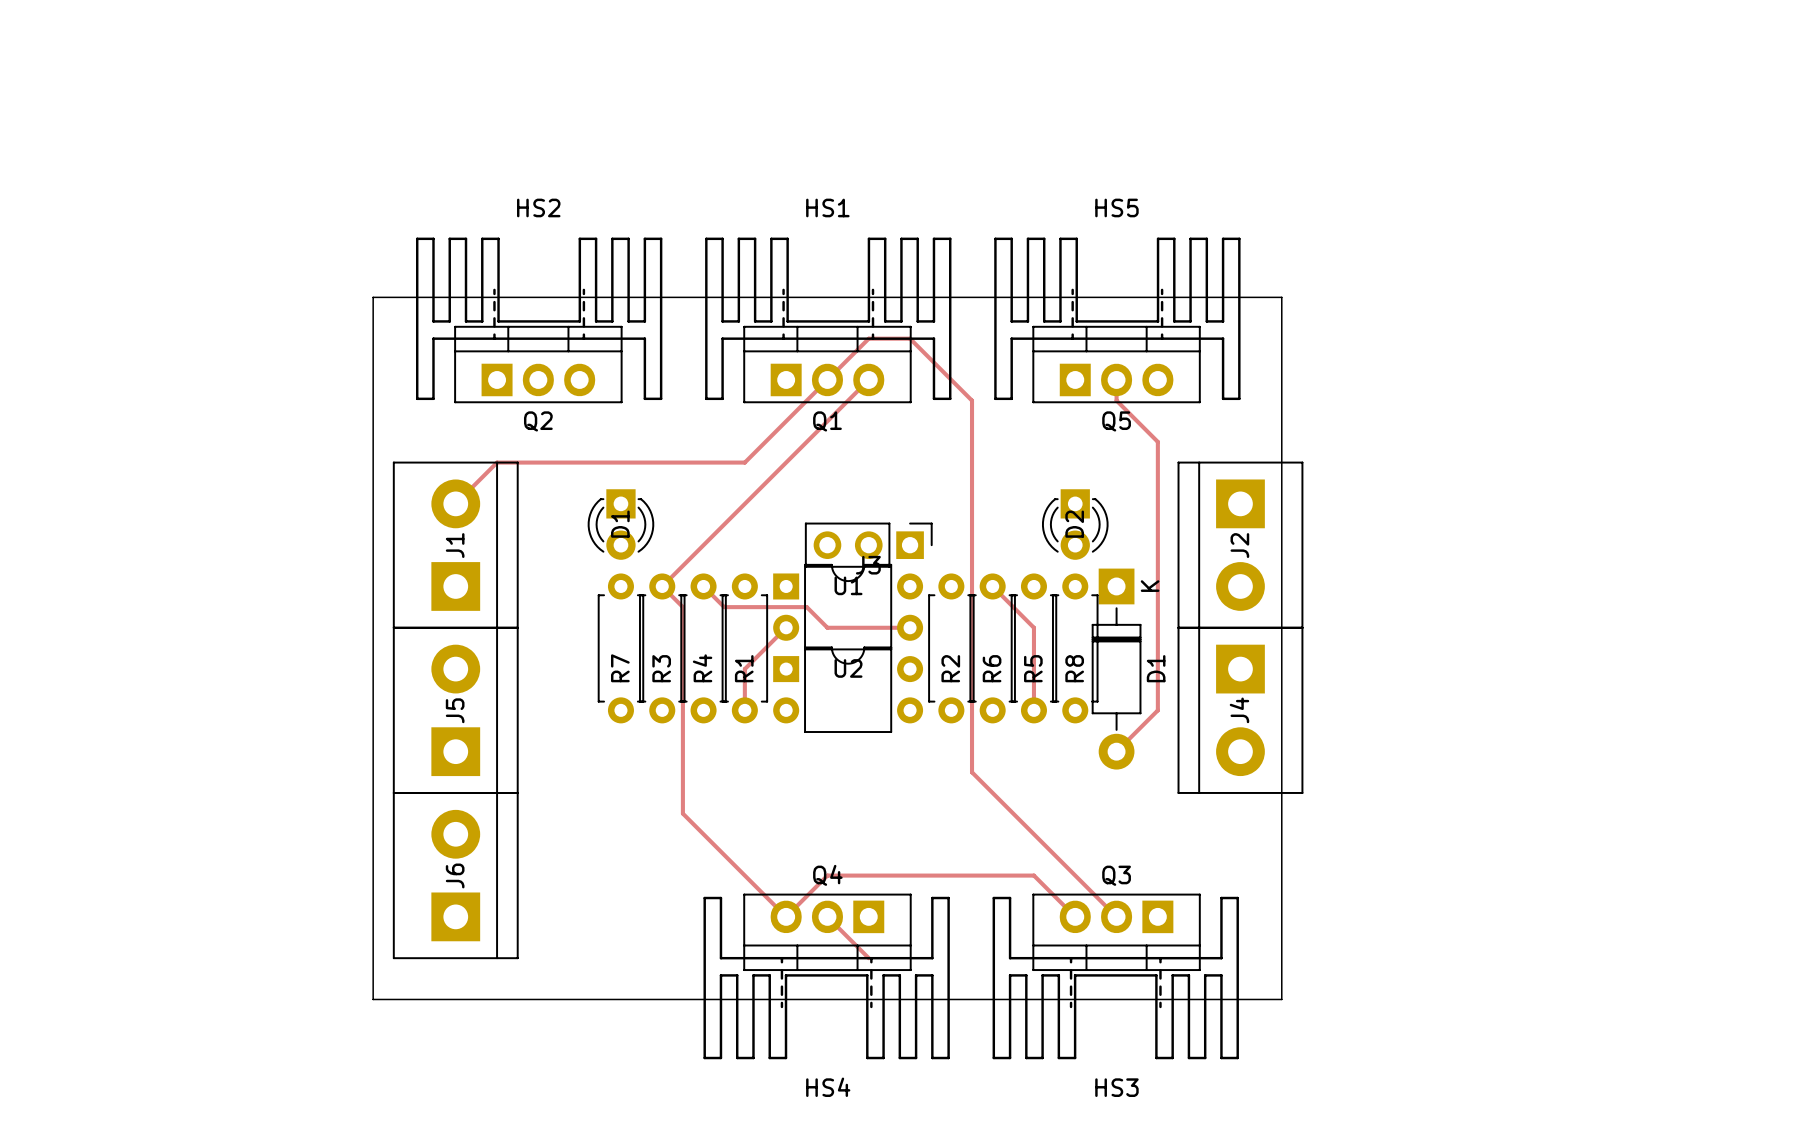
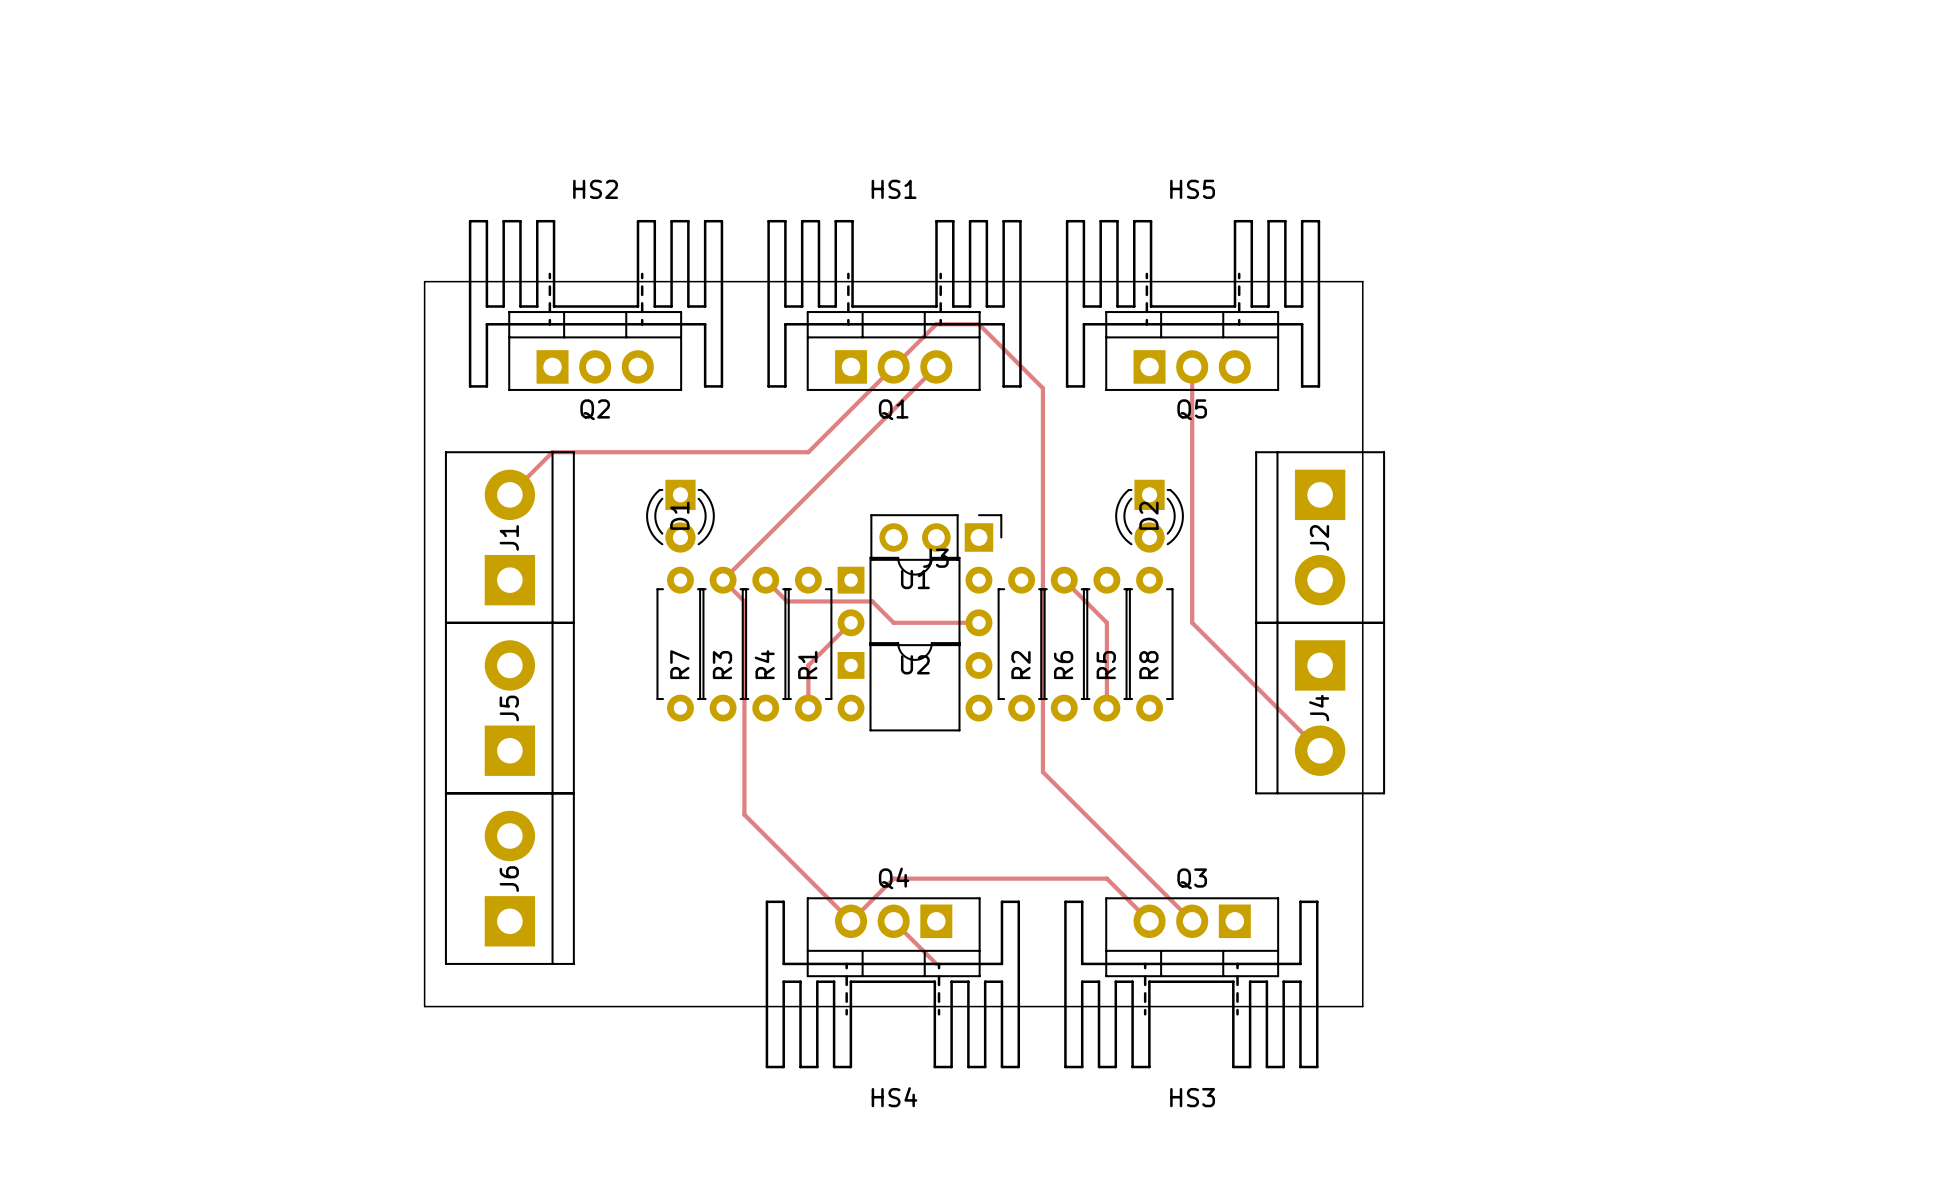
track: (1116, 400) (1157, 441) (1157, 710) (1116, 751) -> (1192, 388) (1192, 622) (1320, 750)
D1: (1116, 669) -> none

